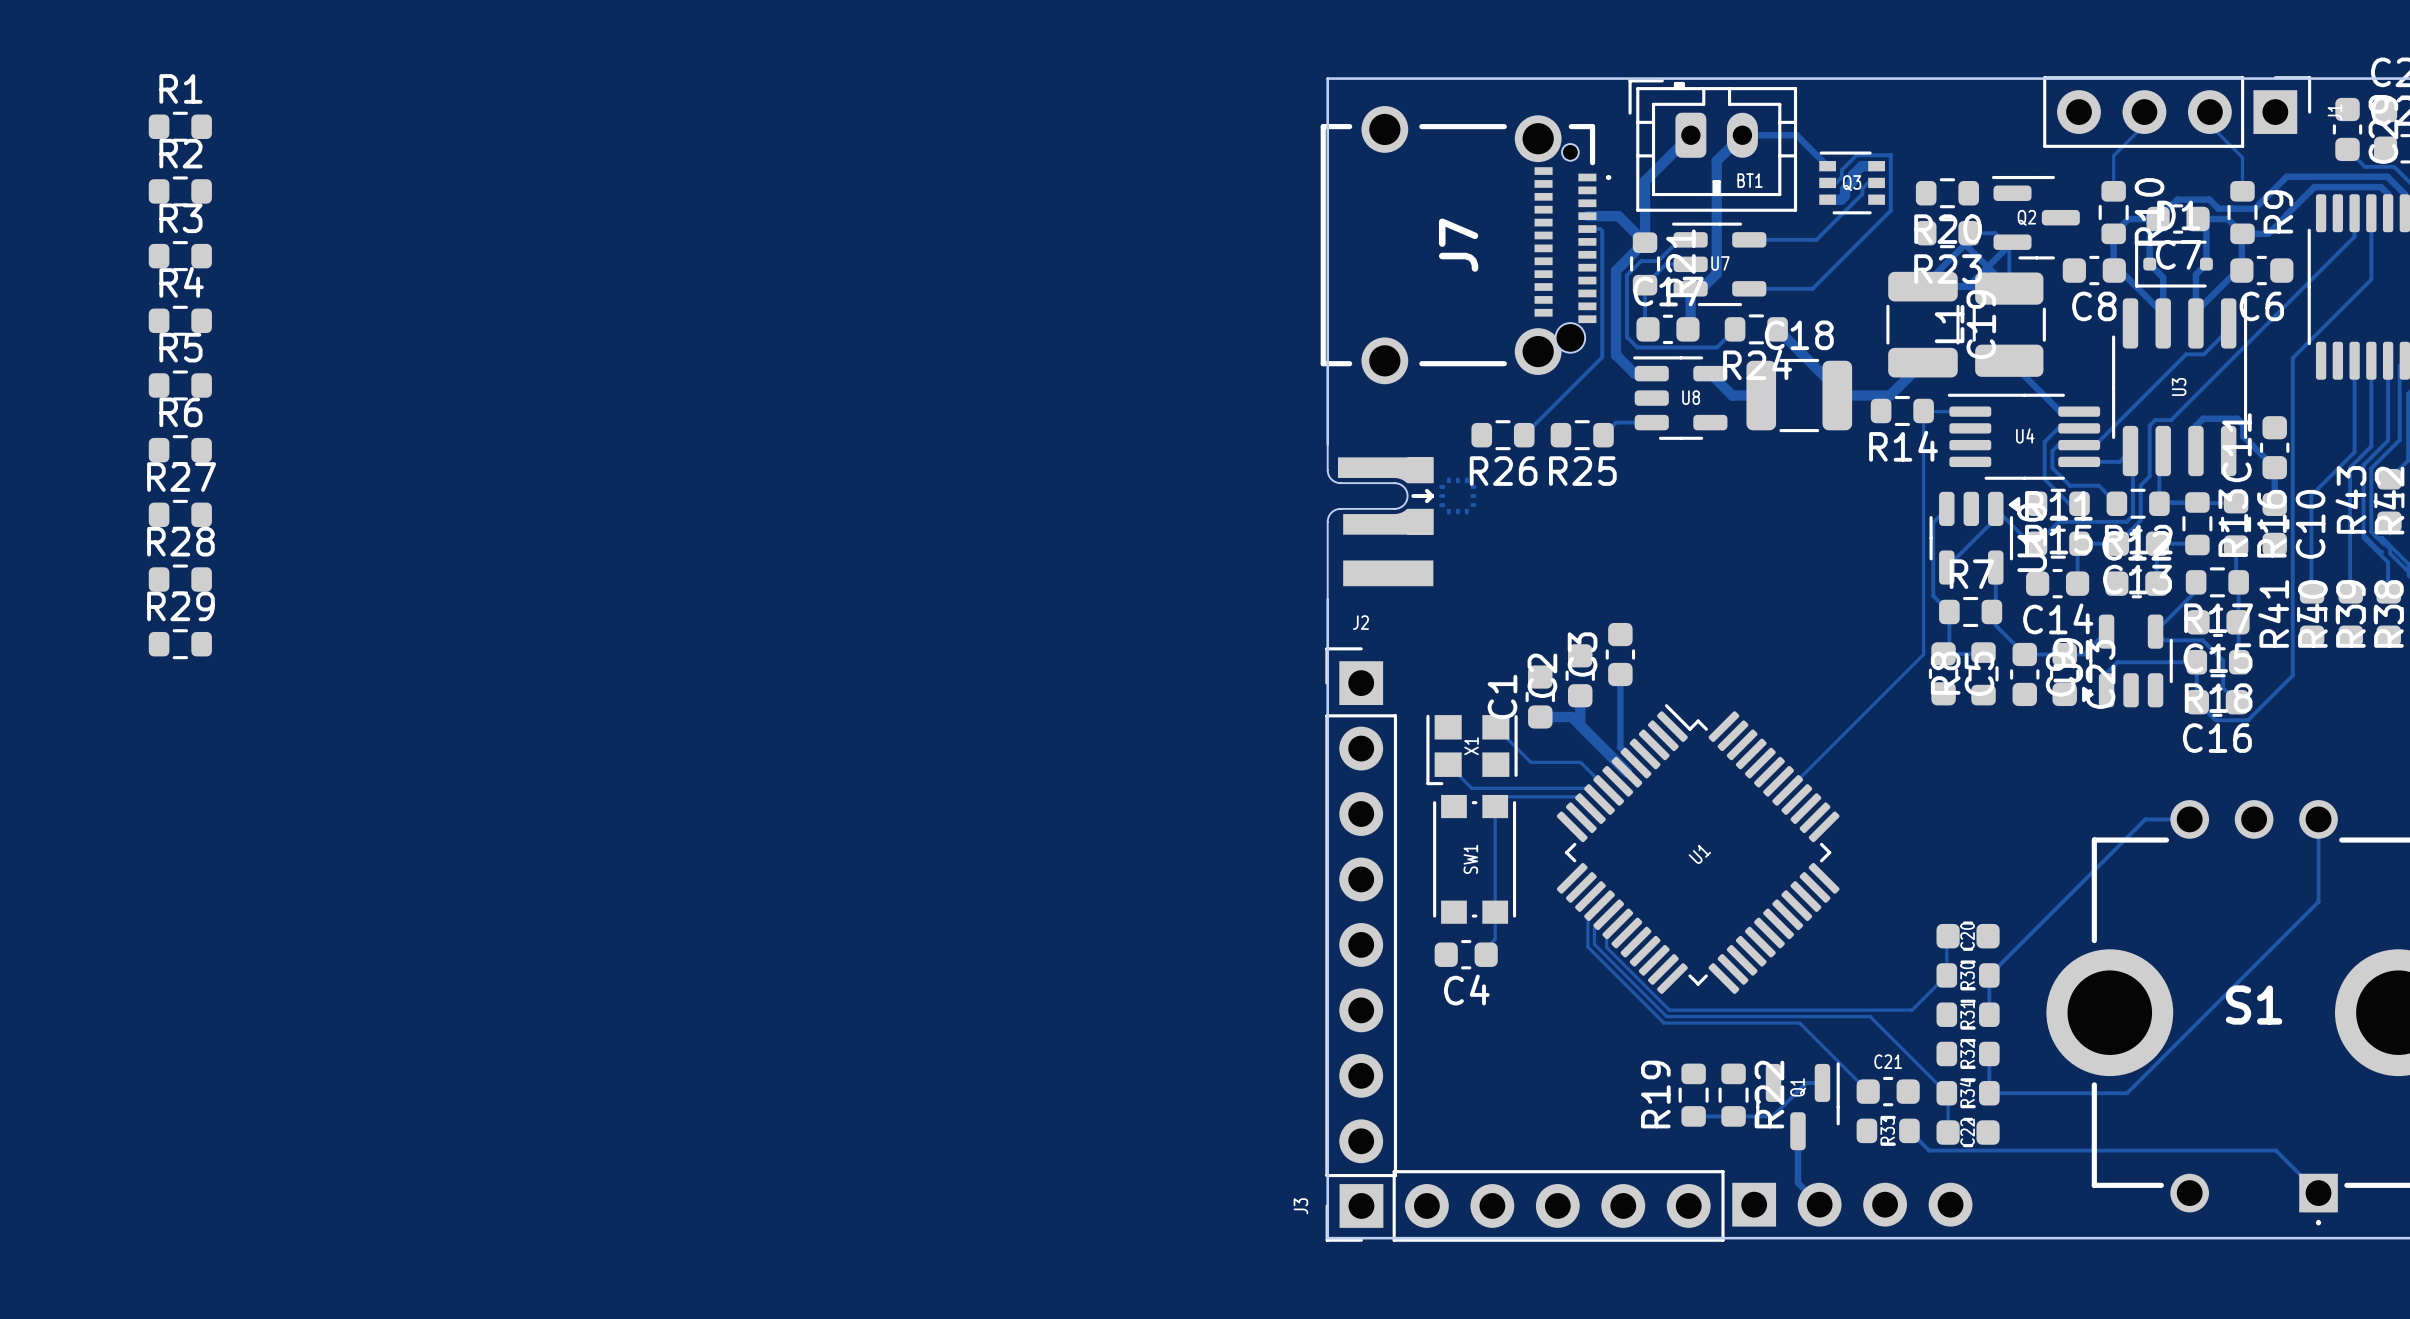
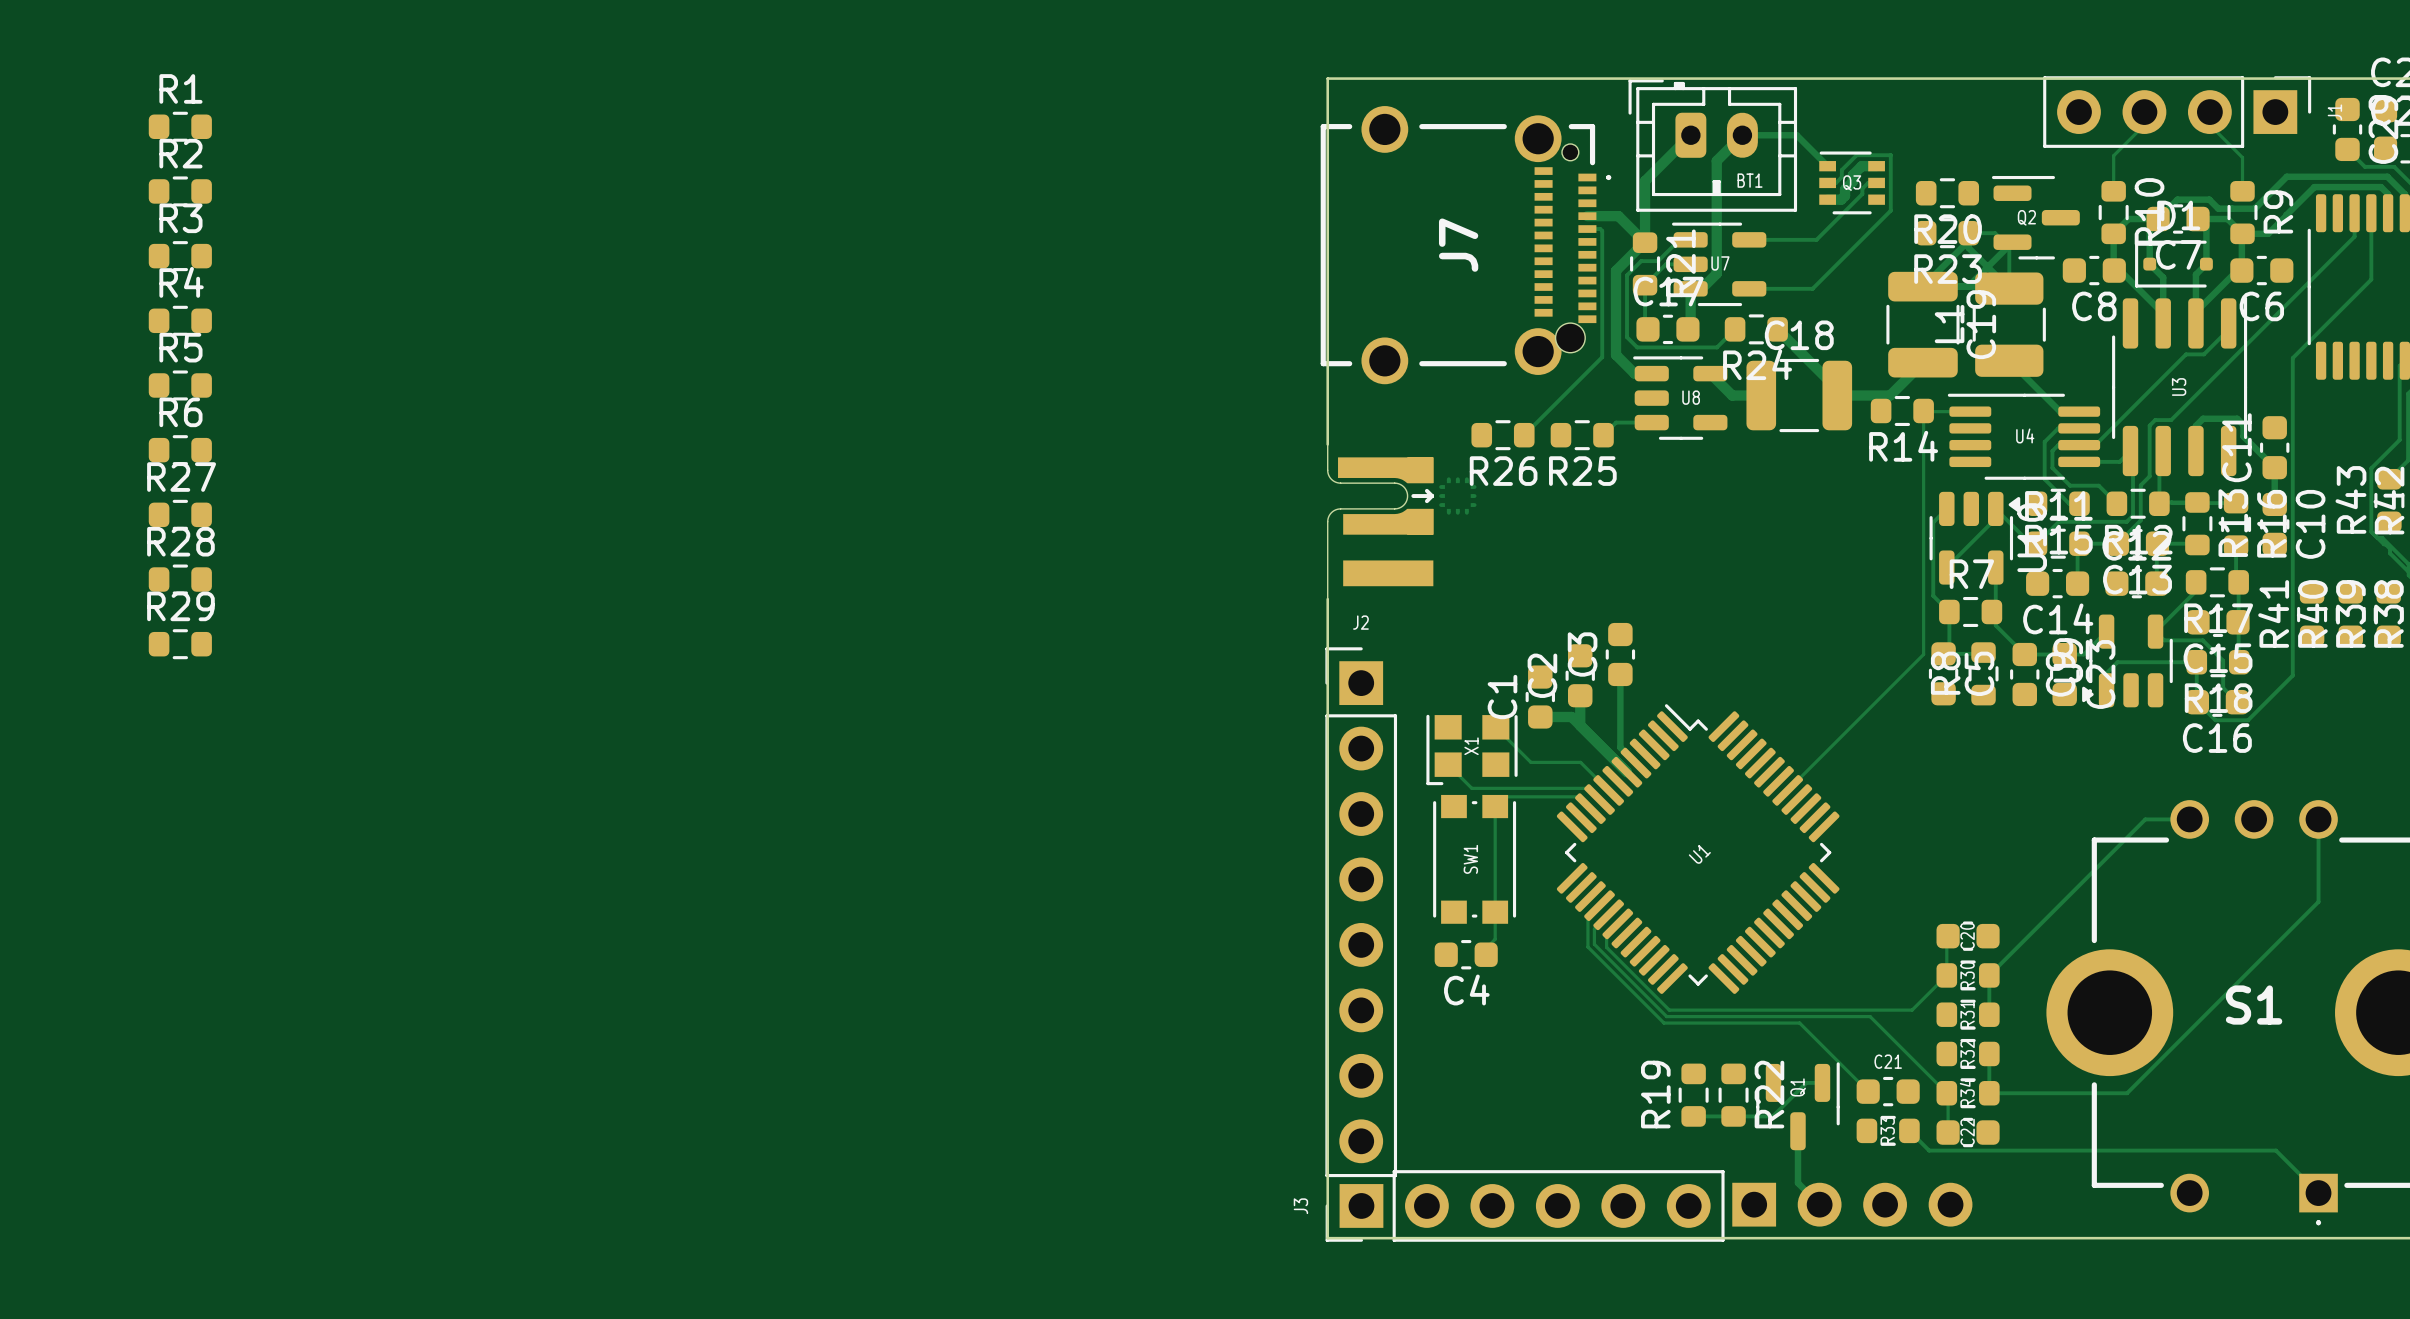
track: (2354, 360) (2354, 452) (2311, 495) (2311, 581) -> none
track: (2371, 360) (2371, 446) (2350, 467) (2350, 581) -> none
track: (2388, 360) (2388, 440) (2363, 465) (2363, 537) (2388, 562) (2388, 581) -> none
track: (2363, 534) (2382, 552) -> none

